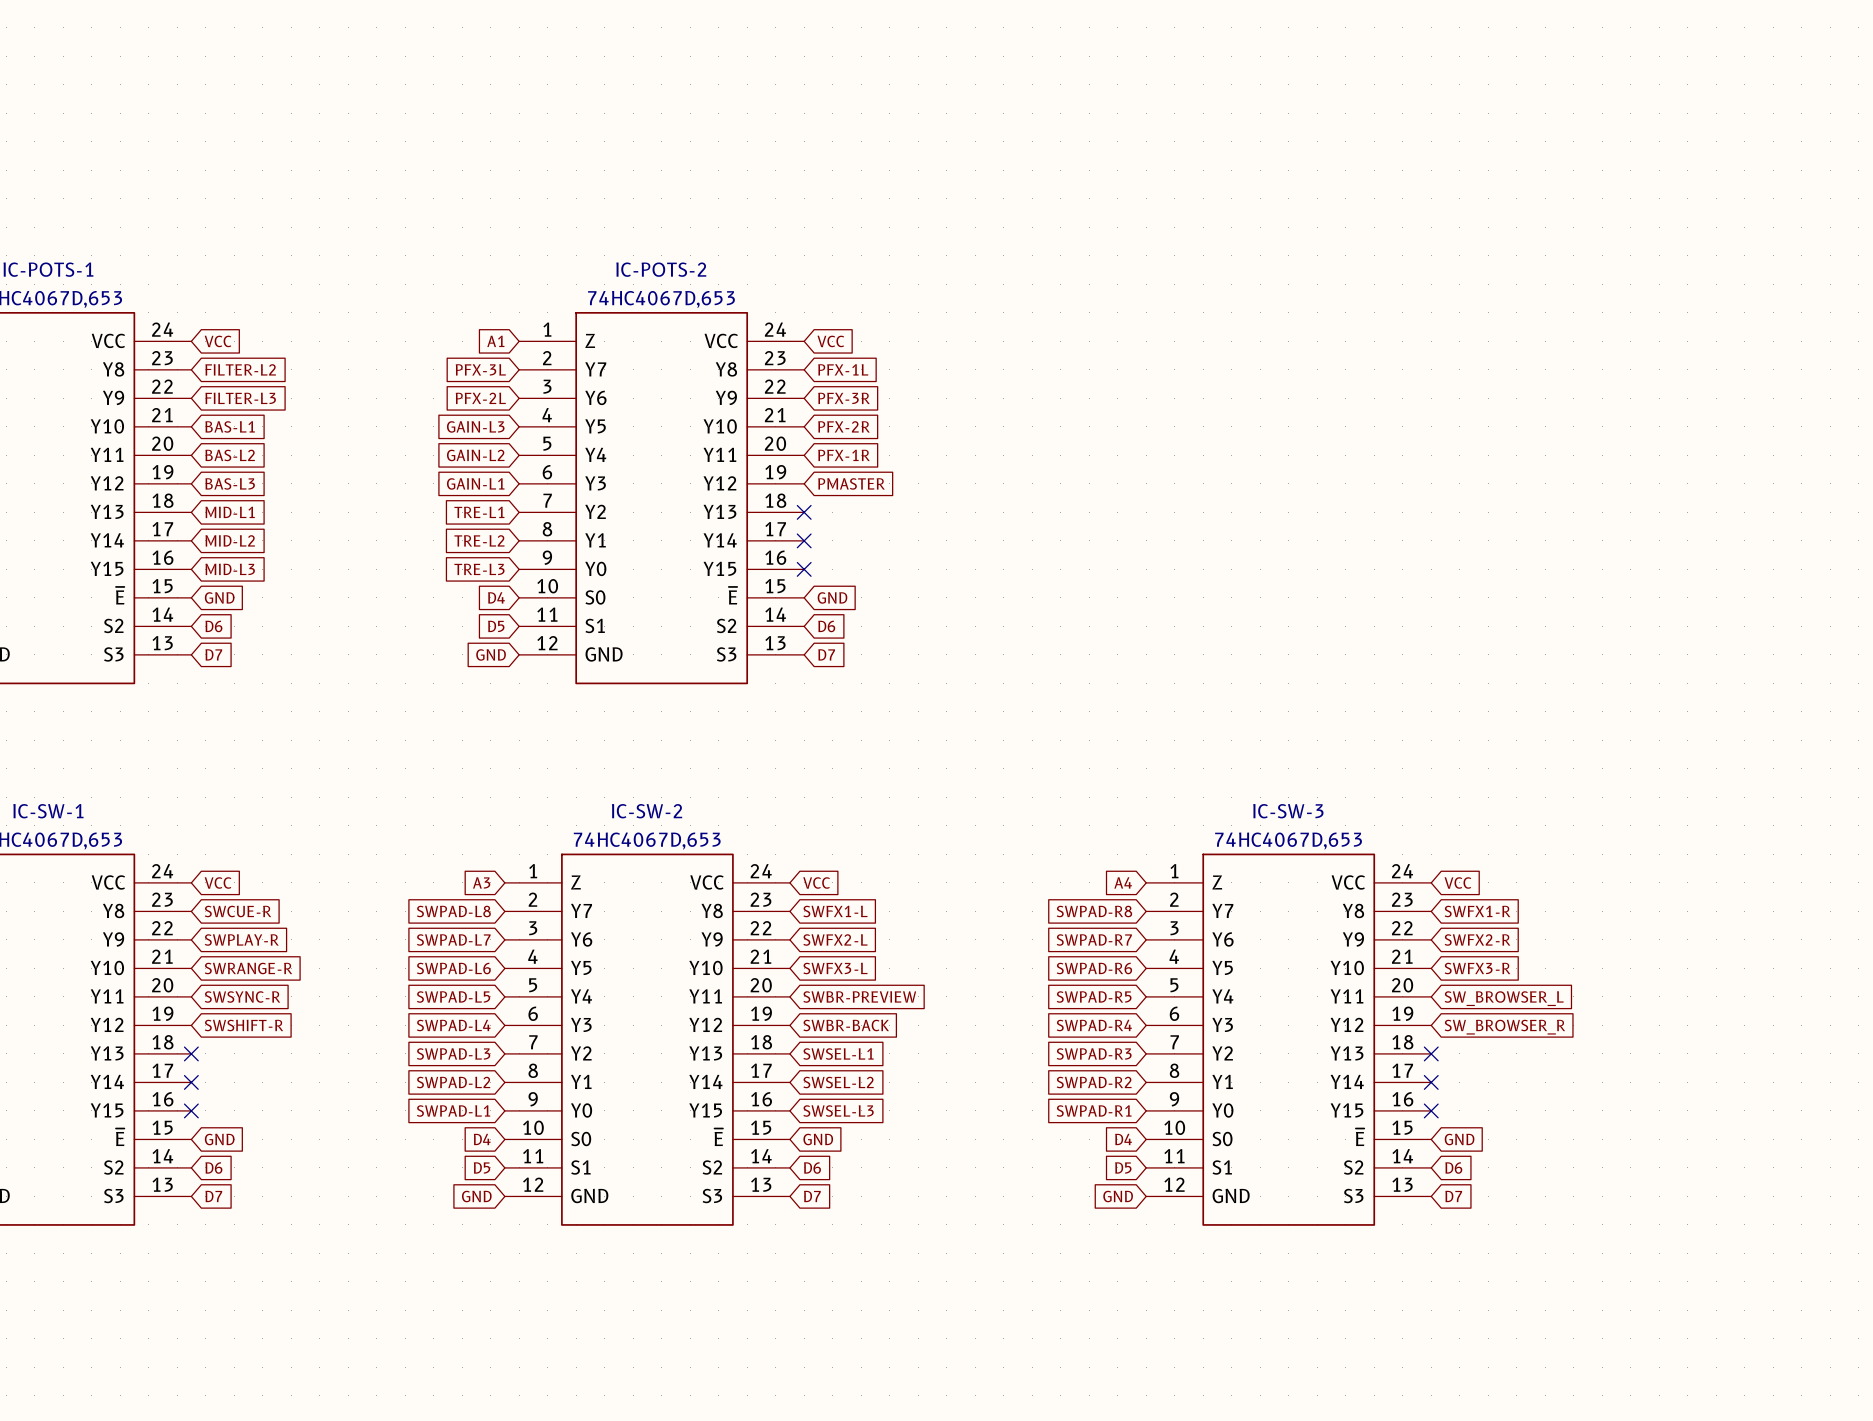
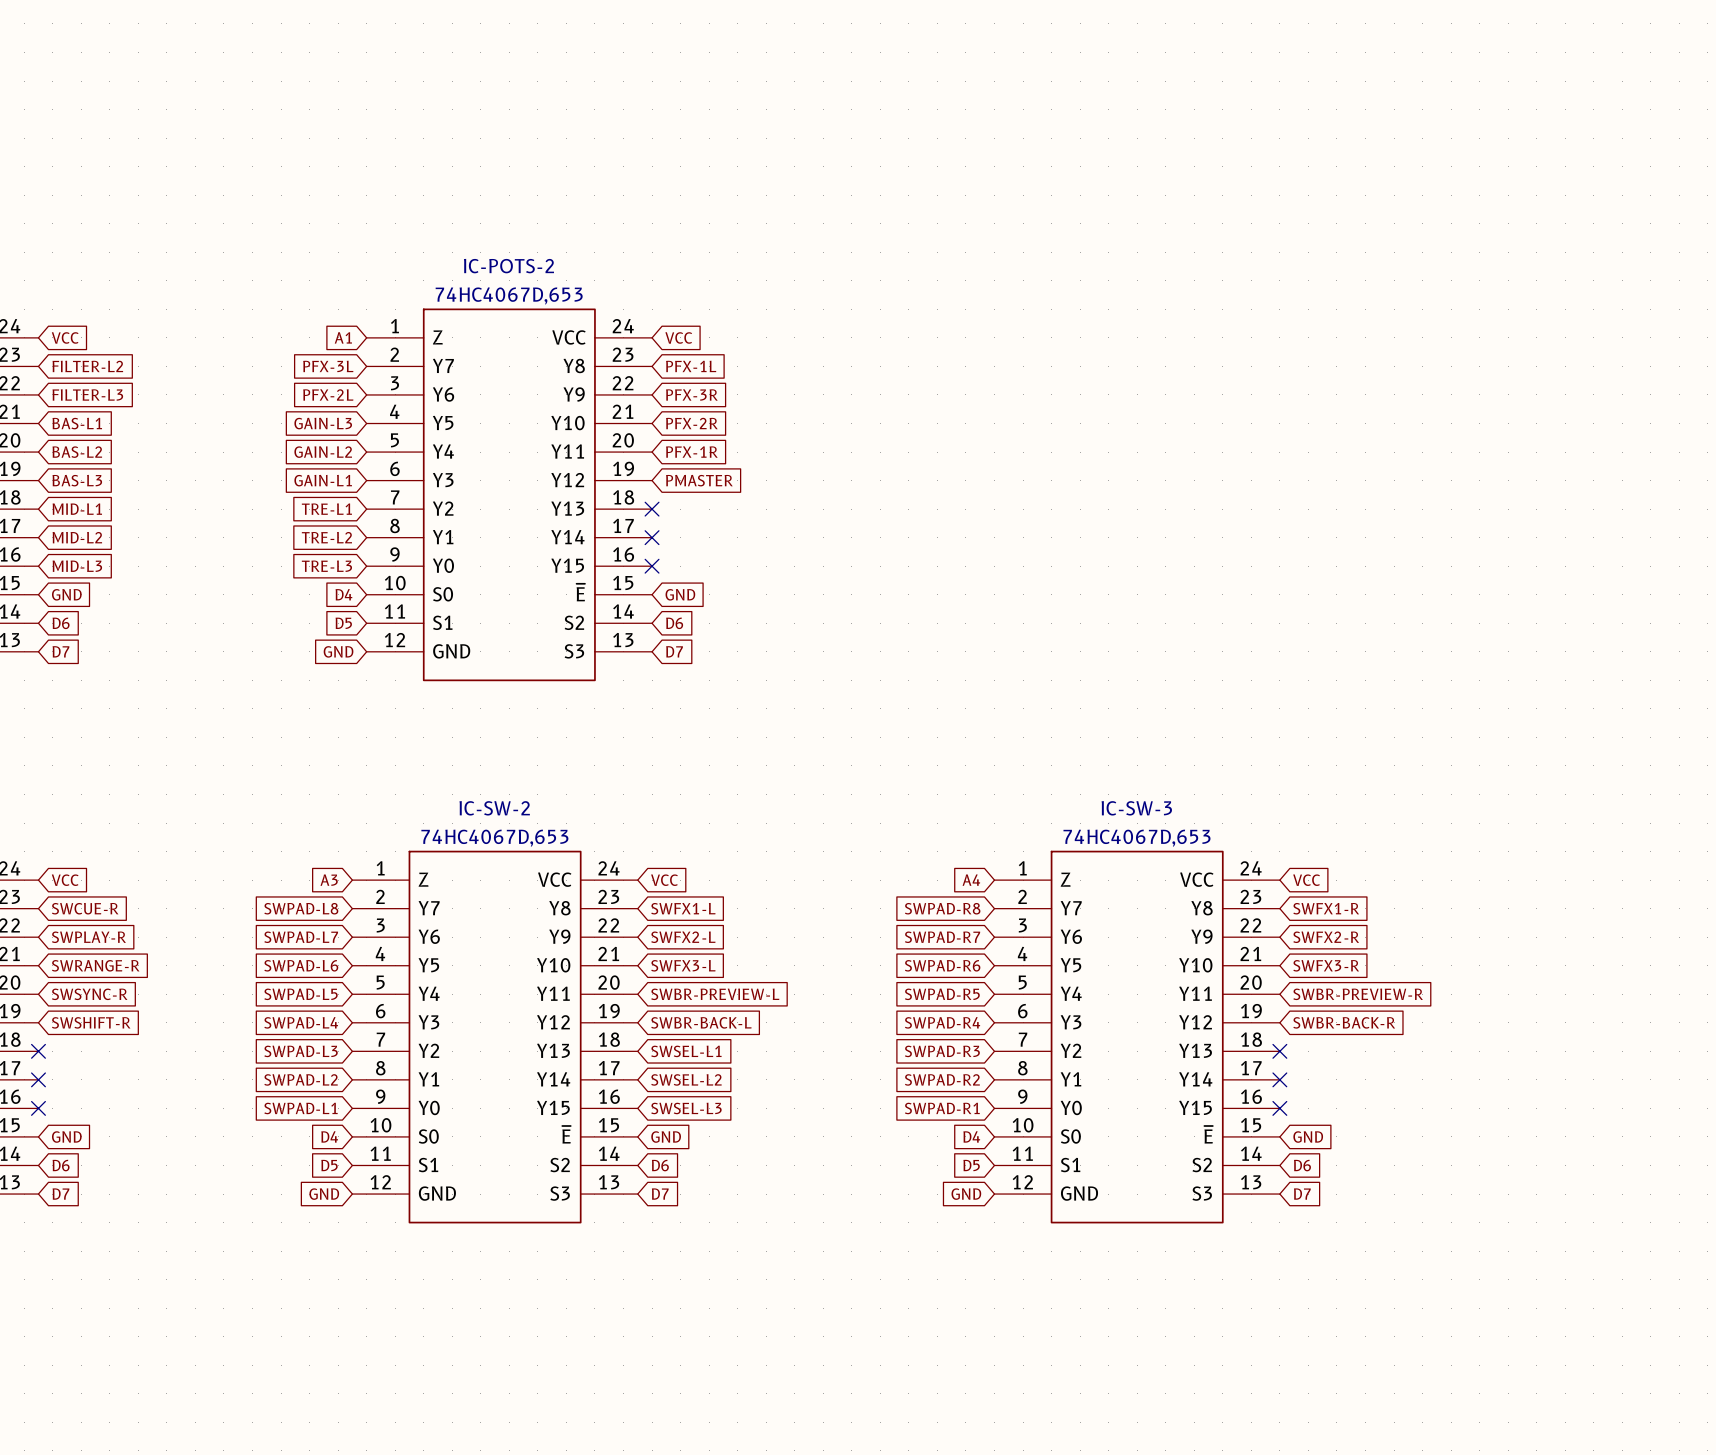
global label: SWBR-PREVIEW (859, 997) -> SWBR-PREVIEW-L (715, 994)
global label: SW_BROWSER_L (1504, 998) -> SWBR-PREVIEW-R (1358, 994)
global label: SWBR-BACK (846, 1025) -> SWBR-BACK-L (701, 1022)
global label: SW_BROWSER_R (1504, 1027) -> SWBR-BACK-R (1344, 1022)

